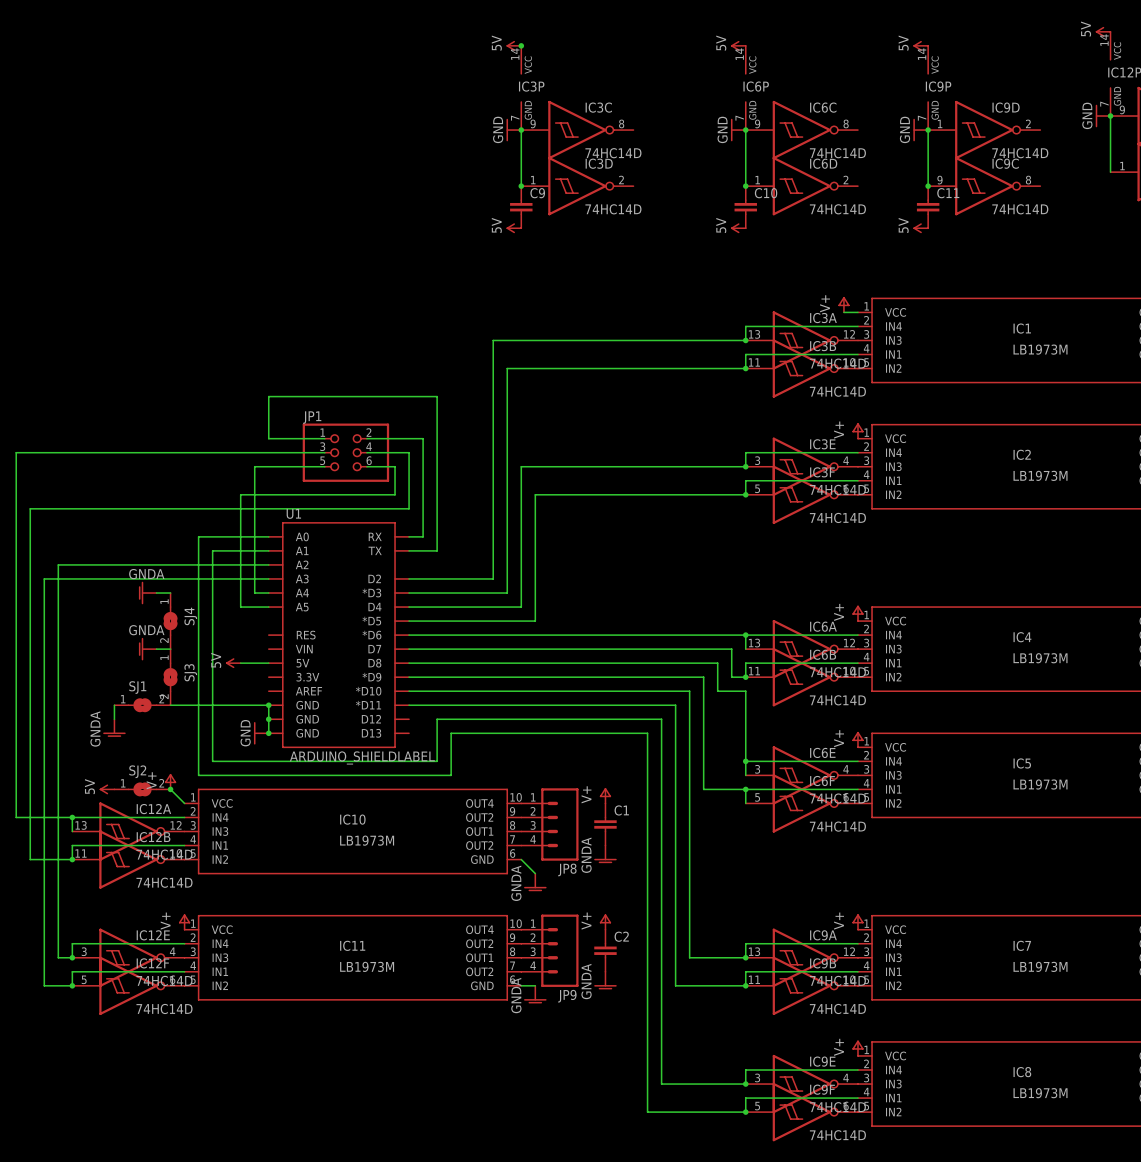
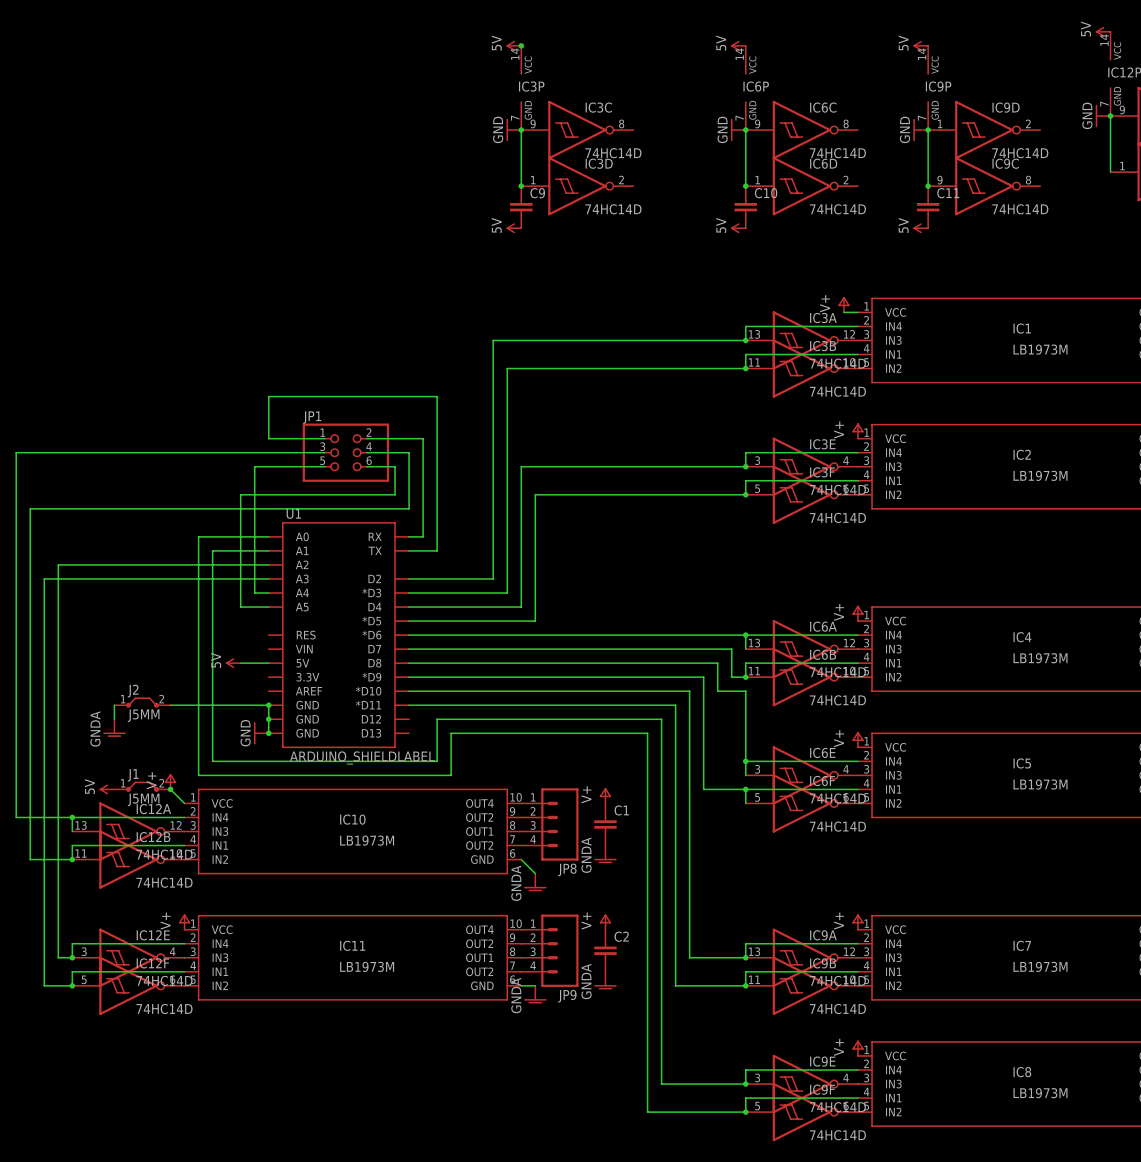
power symbol: GNDA (147, 593) -> none
wire: (156, 593) (170, 593) -> none
SJ4: (170, 621) -> none
power symbol: GNDA (147, 649) -> none
wire: (156, 649) (170, 649) -> none
SJ3: (170, 677) -> none
J2: none -> J5MM (142, 702)
SJ1: (142, 705) -> none
J1: none -> J5MM (142, 786)
SJ2: (142, 789) -> none

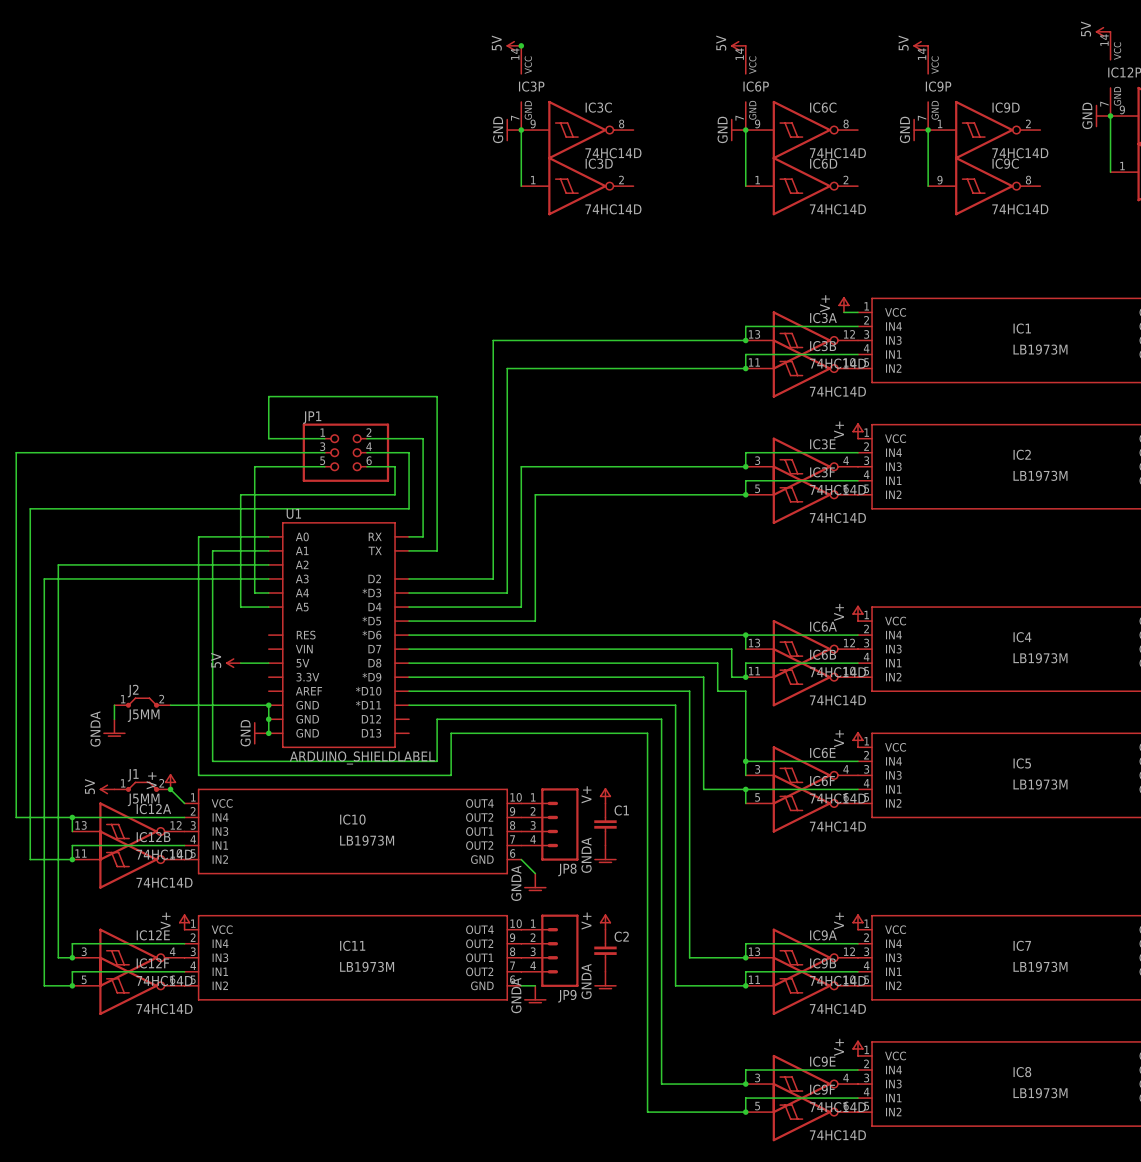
junction: (521, 186) -> none
junction: (745, 186) -> none
junction: (928, 186) -> none
C9: (521, 207) -> none
C10: (745, 207) -> none
C11: (928, 207) -> none
power symbol: 5V (513, 228) -> none
power symbol: 5V (738, 228) -> none
power symbol: 5V (920, 228) -> none

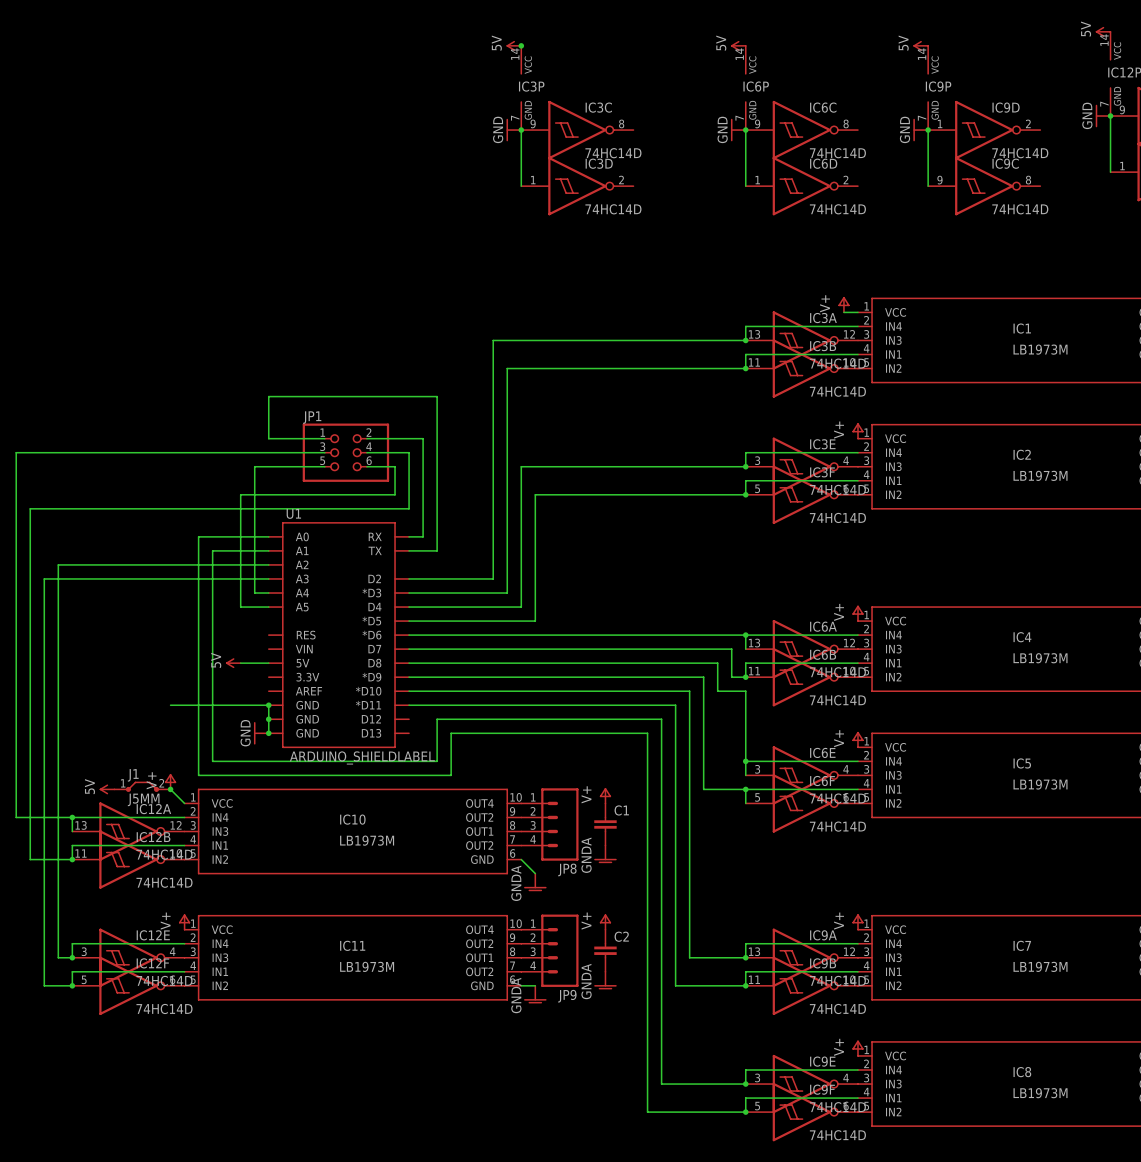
J2: J5MM (142, 702) -> none
wire: (114, 705) (114, 719) -> none
power symbol: GNDA (114, 728) -> none

